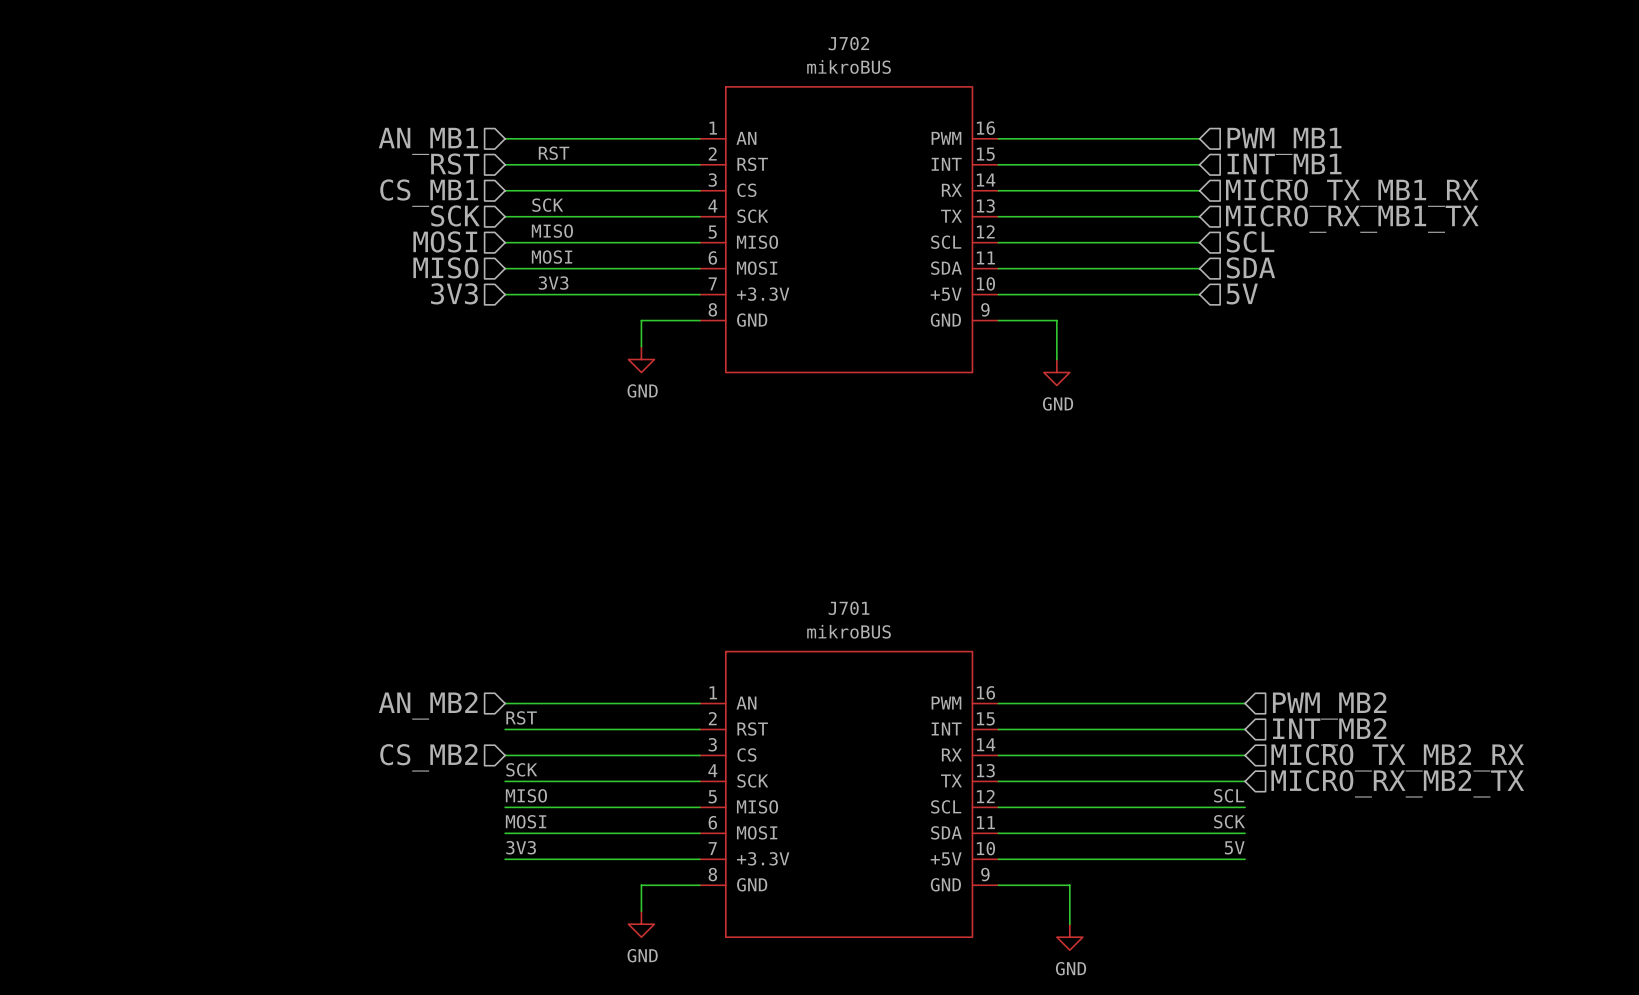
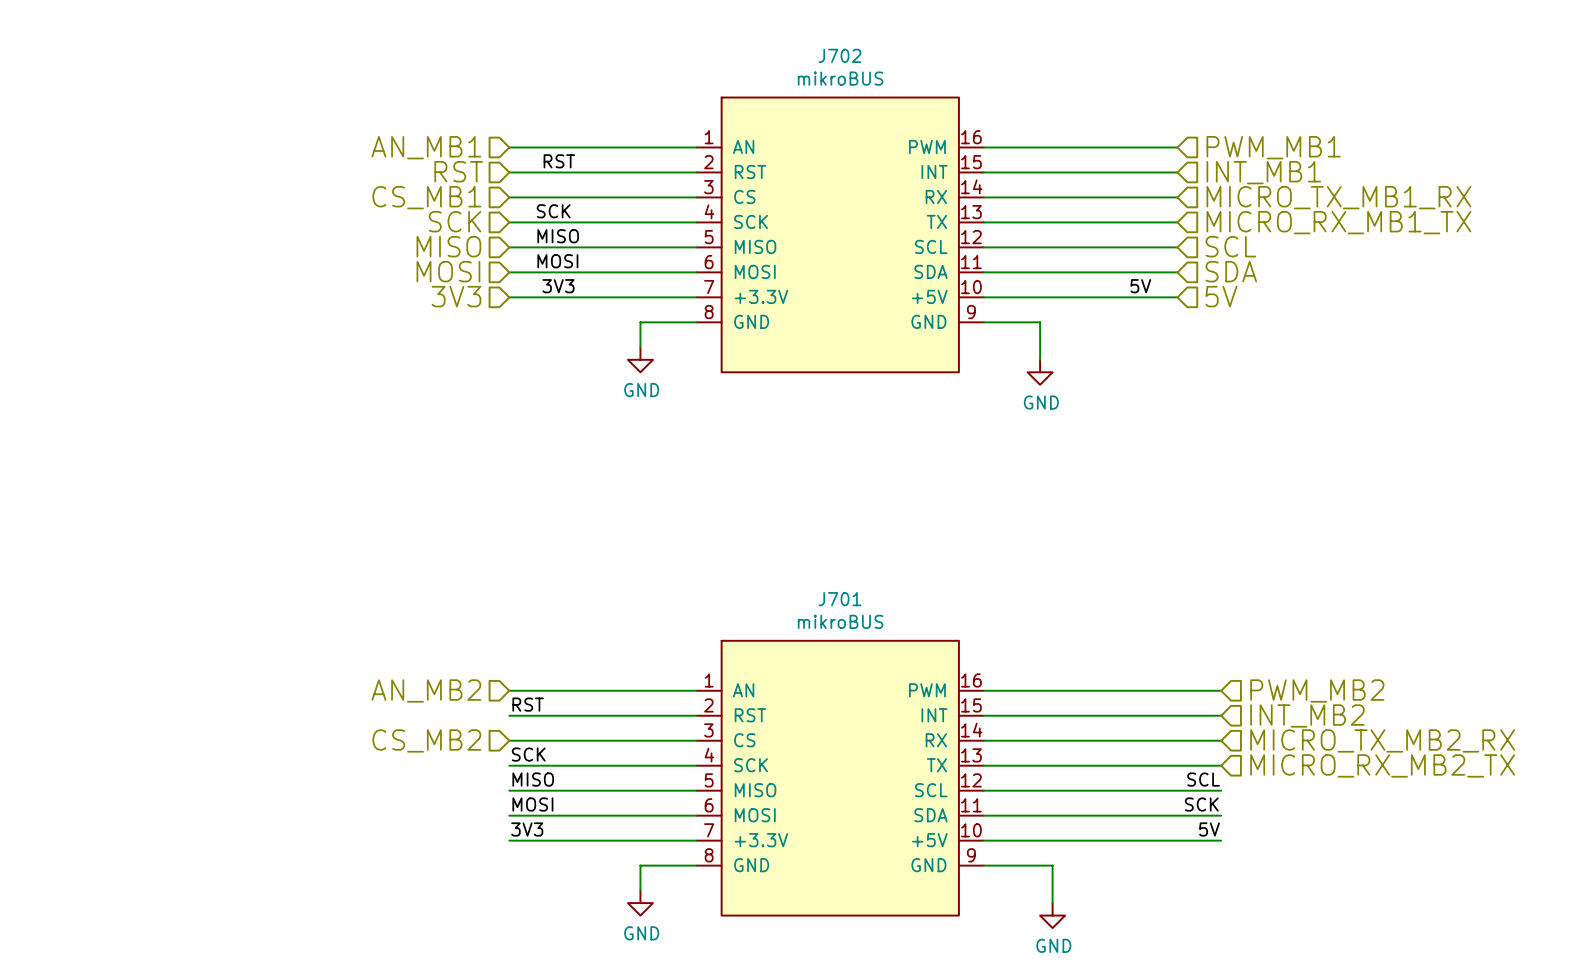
hierarchical label: MOSI (445, 241) -> MISO (448, 246)
hierarchical label: MISO (445, 267) -> MOSI (448, 271)
label: none -> 5V (1140, 286)

